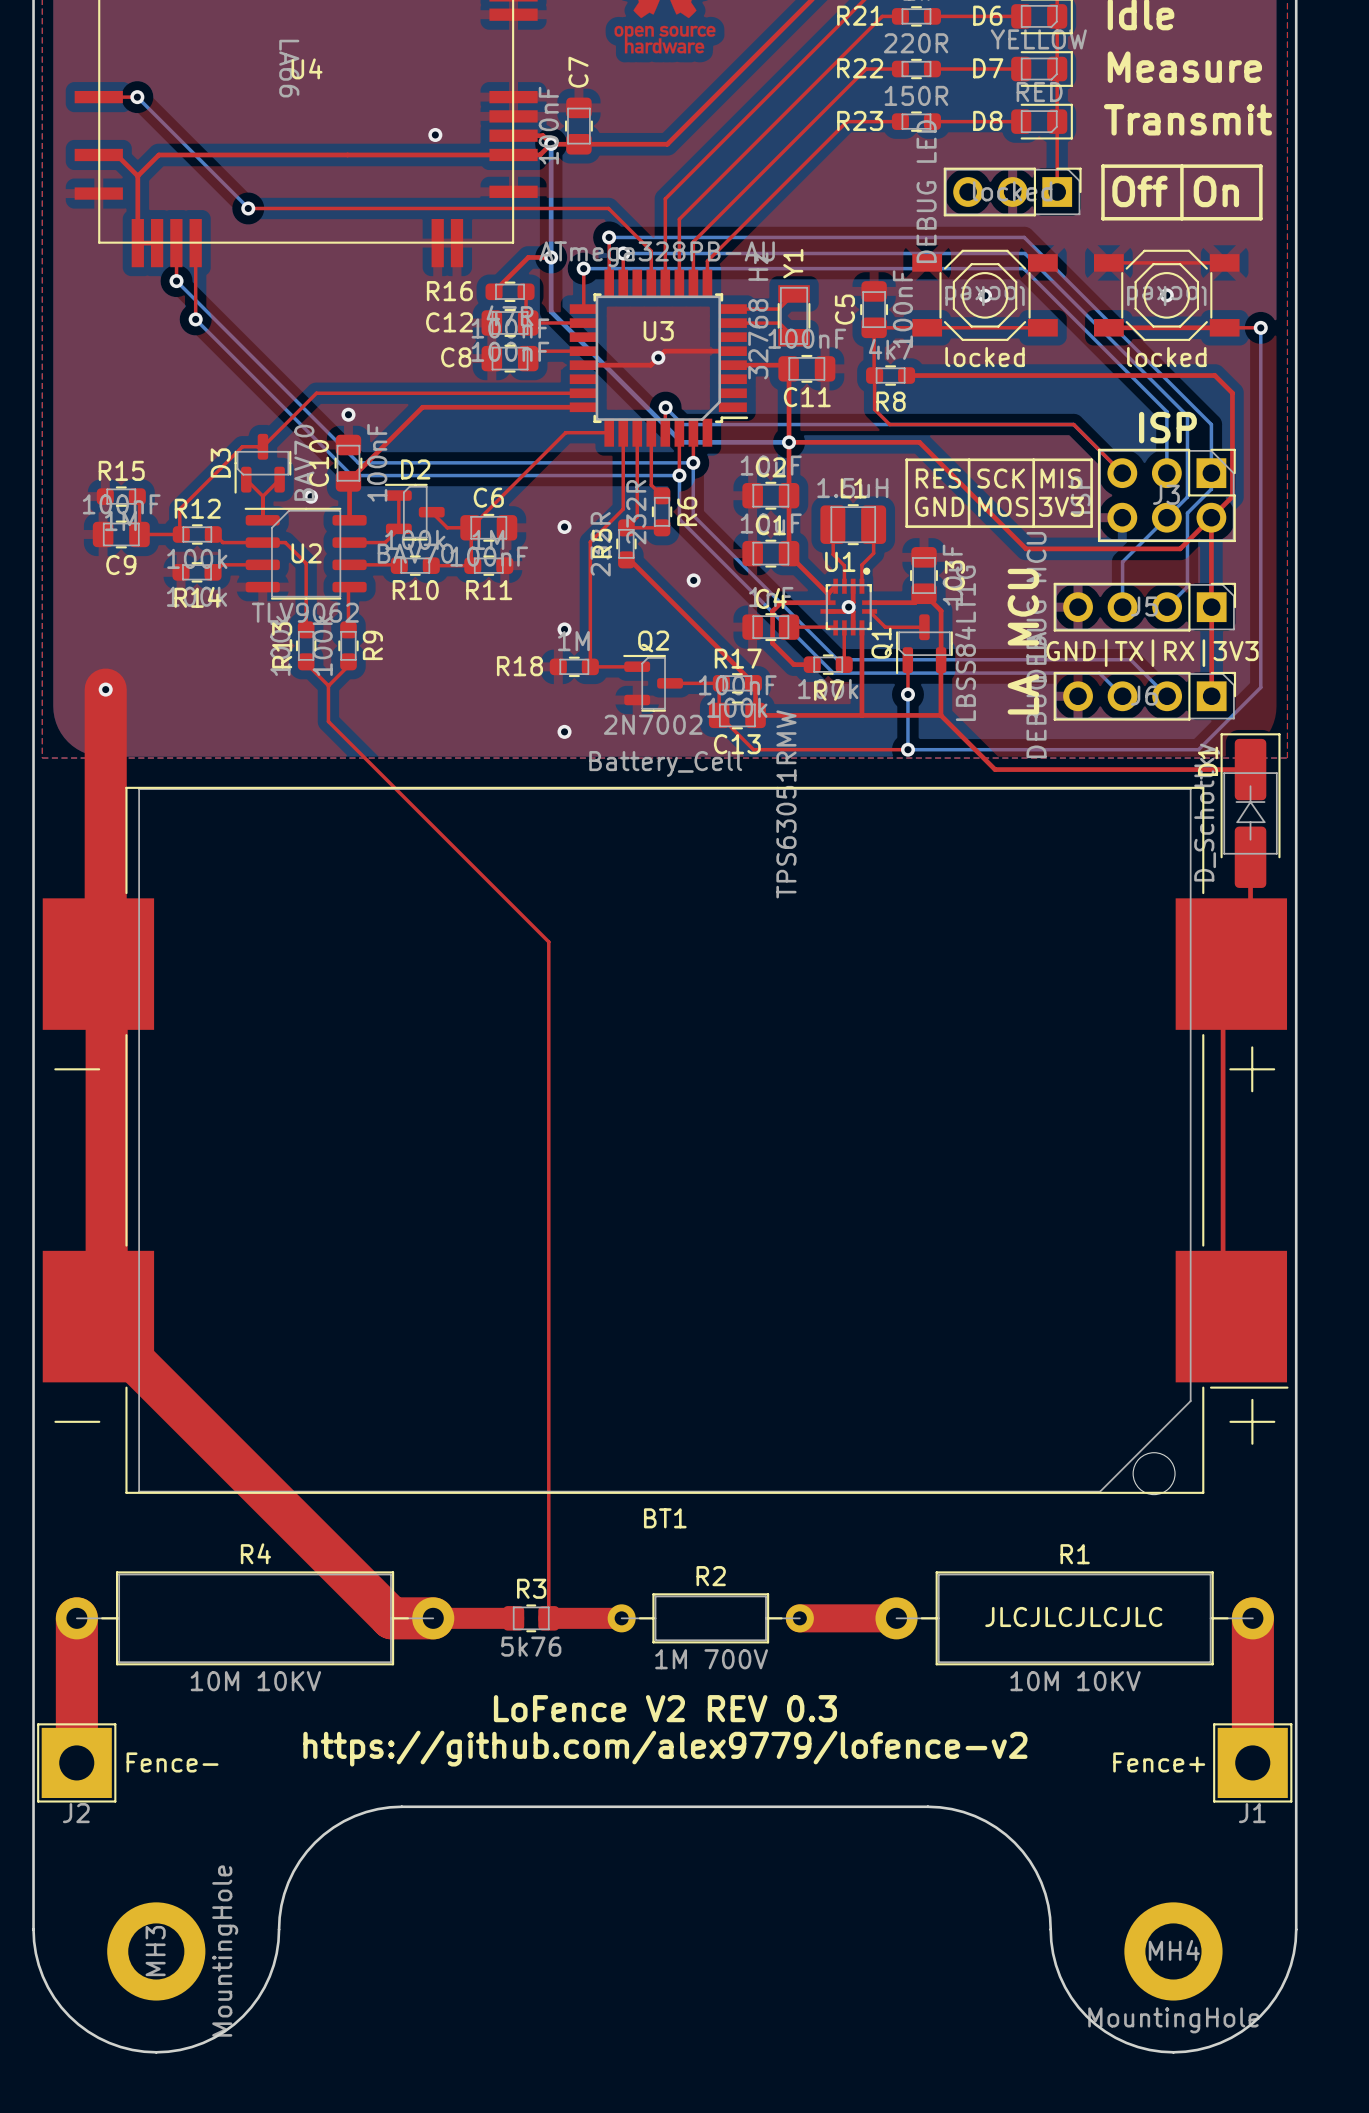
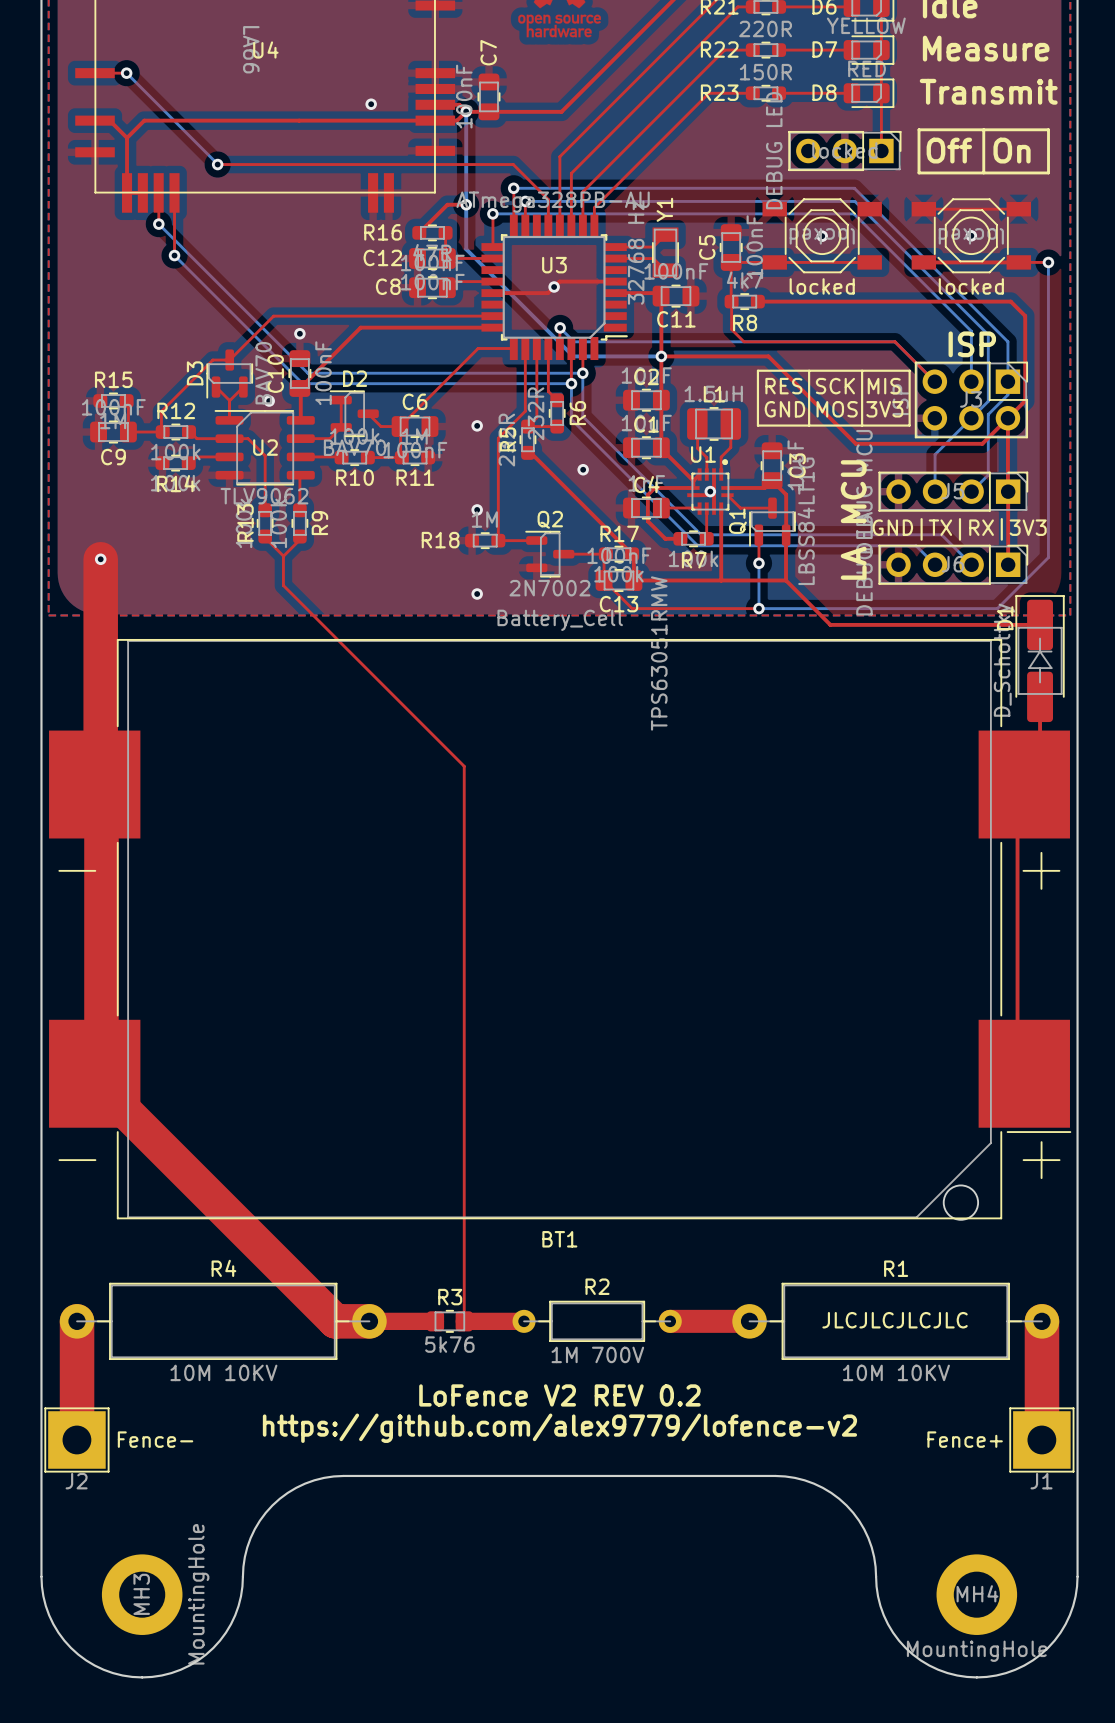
text: LoFence V2 REV 0.3 (665, 1708) -> LoFence V2 REV 0.2 (559, 1395)

